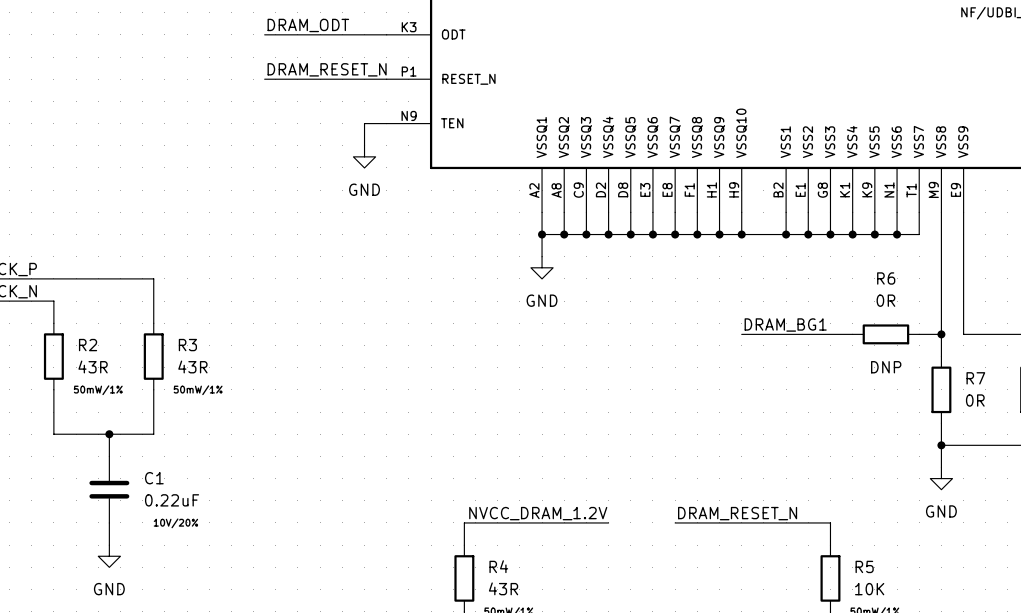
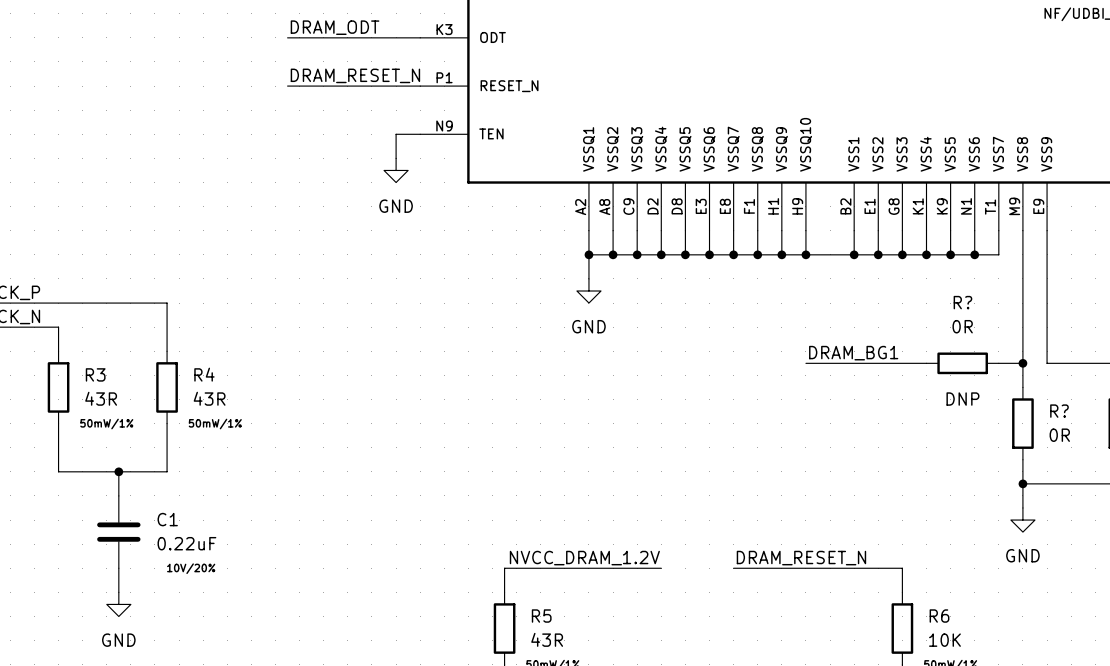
R6 name: R6 (886, 278) -> R? (962, 302)
R2 name: R2 (88, 345) -> R3 (95, 374)
R3 name: R3 (187, 345) -> R4 (204, 374)
R7 name: R7 (975, 378) -> R? (1059, 411)
R4 name: R4 (498, 566) -> R5 (541, 616)
R5 name: R5 (864, 566) -> R6 (939, 616)

